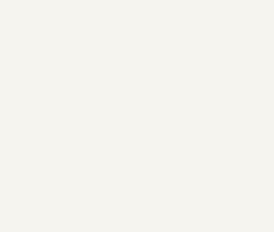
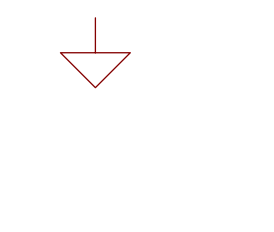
power symbol: none -> (95, 52)

